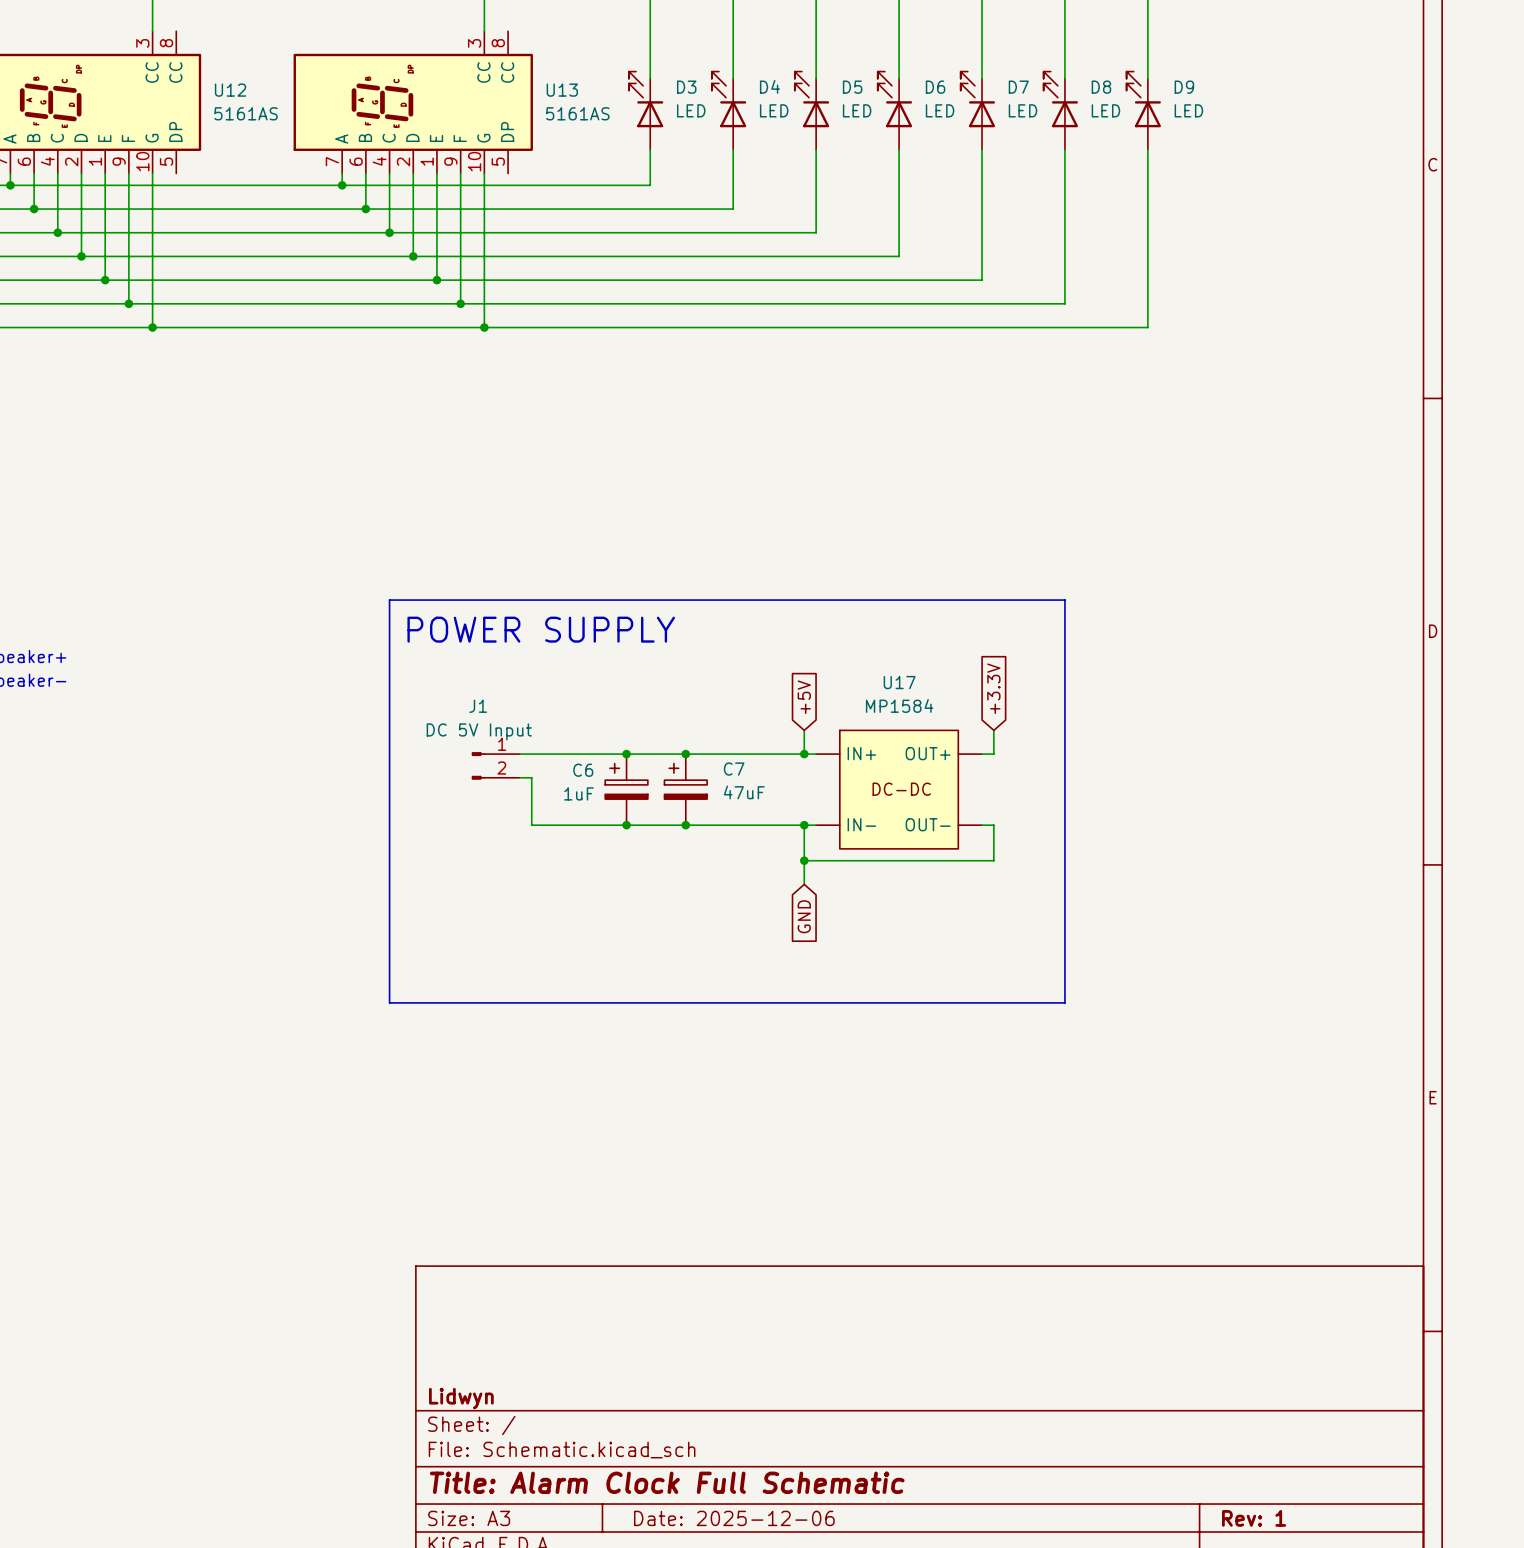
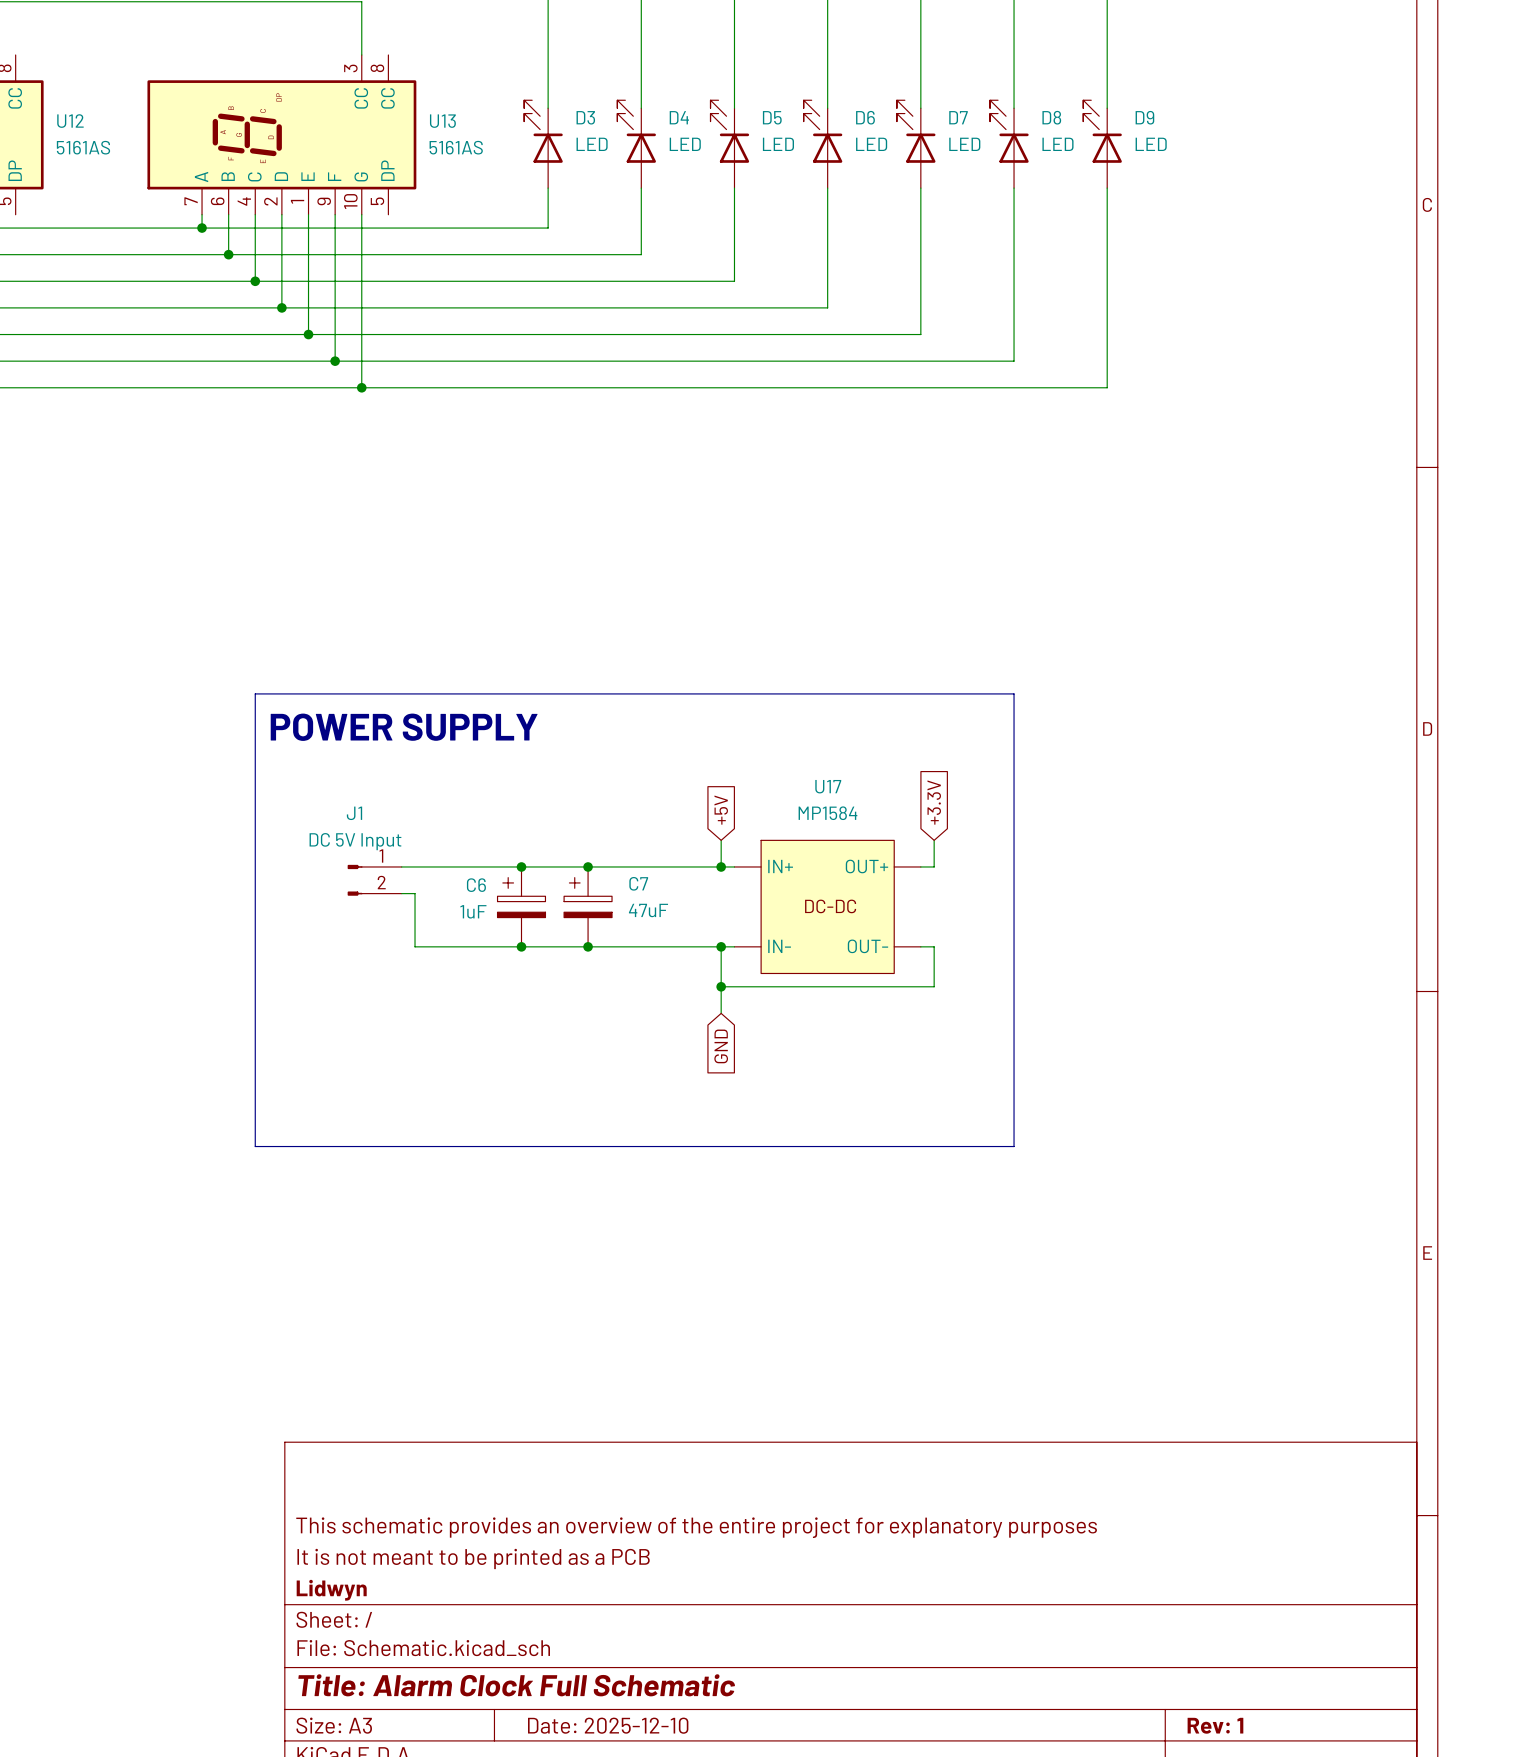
title block: none -> This schematic provides an overview of the entire project for explanatory purposes (696, 1527)
title block: none -> It is not meant to be printed as a PCB (473, 1558)
title block: Date: 2025-12-06 (734, 1518) -> Date: 2025-12-10 (608, 1725)

